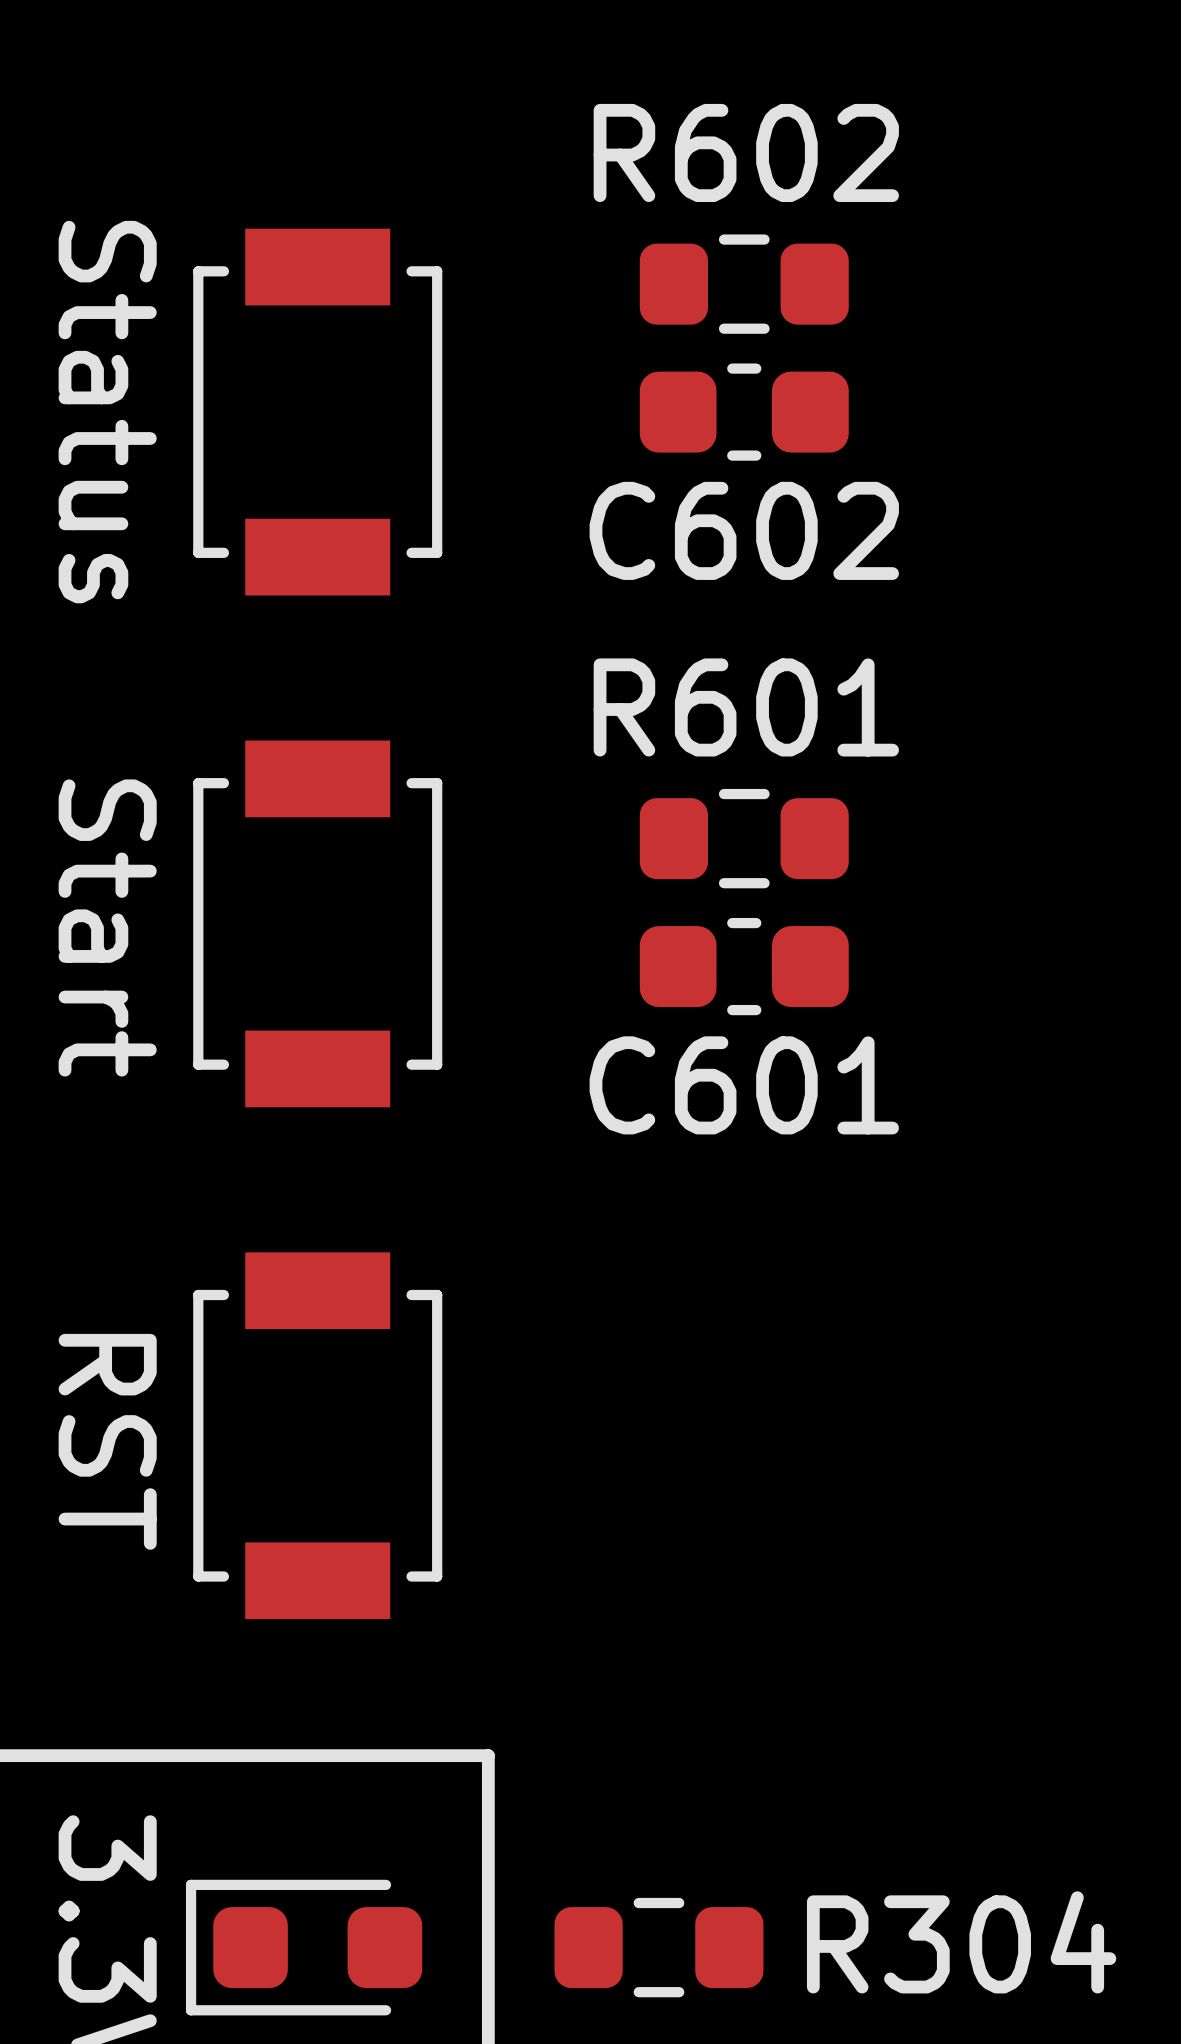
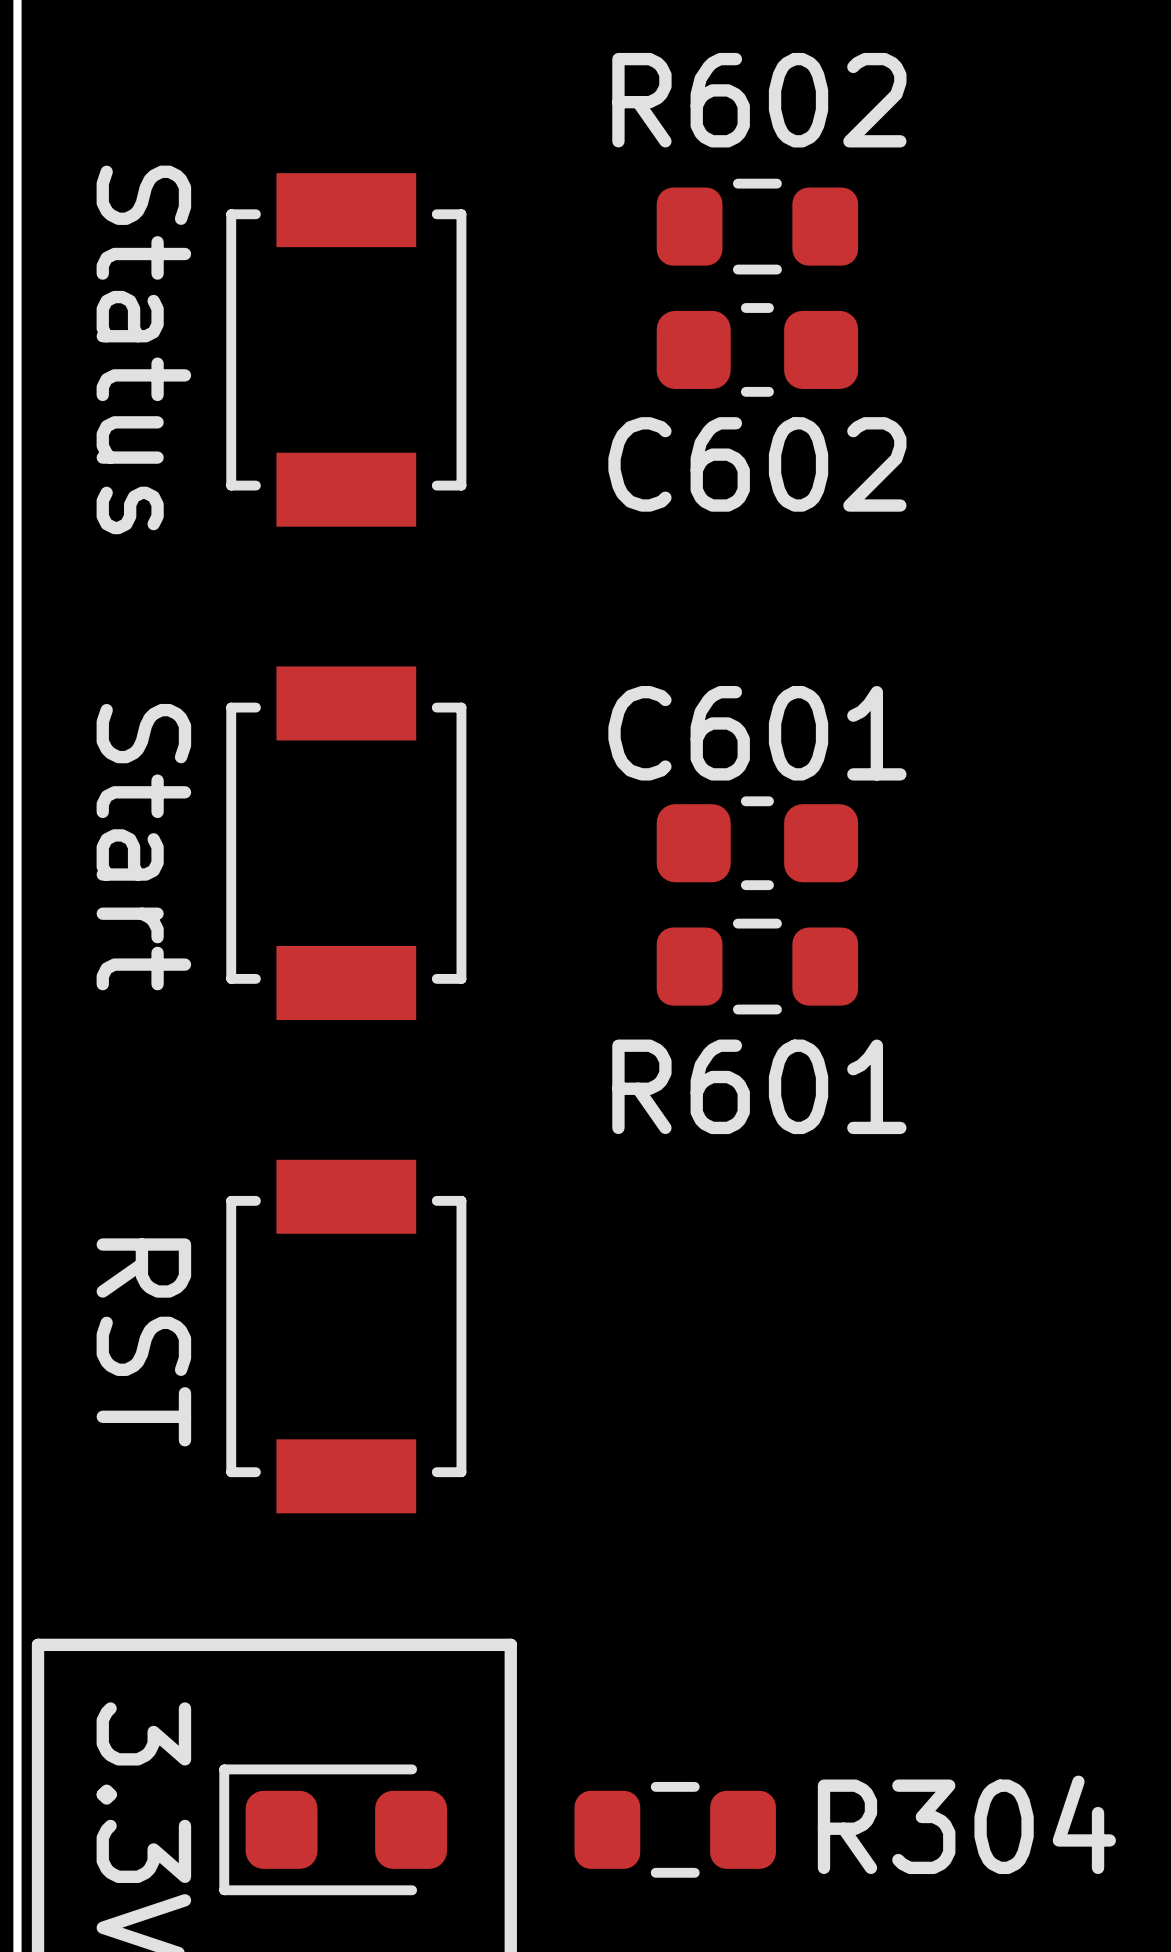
R601 name position: R601 (746, 707) -> R601 (759, 1086)
R601 position: (744, 838) -> (757, 966)
C601 position: (744, 966) -> (757, 843)
C601 name position: C601 (744, 1085) -> C601 (757, 733)

